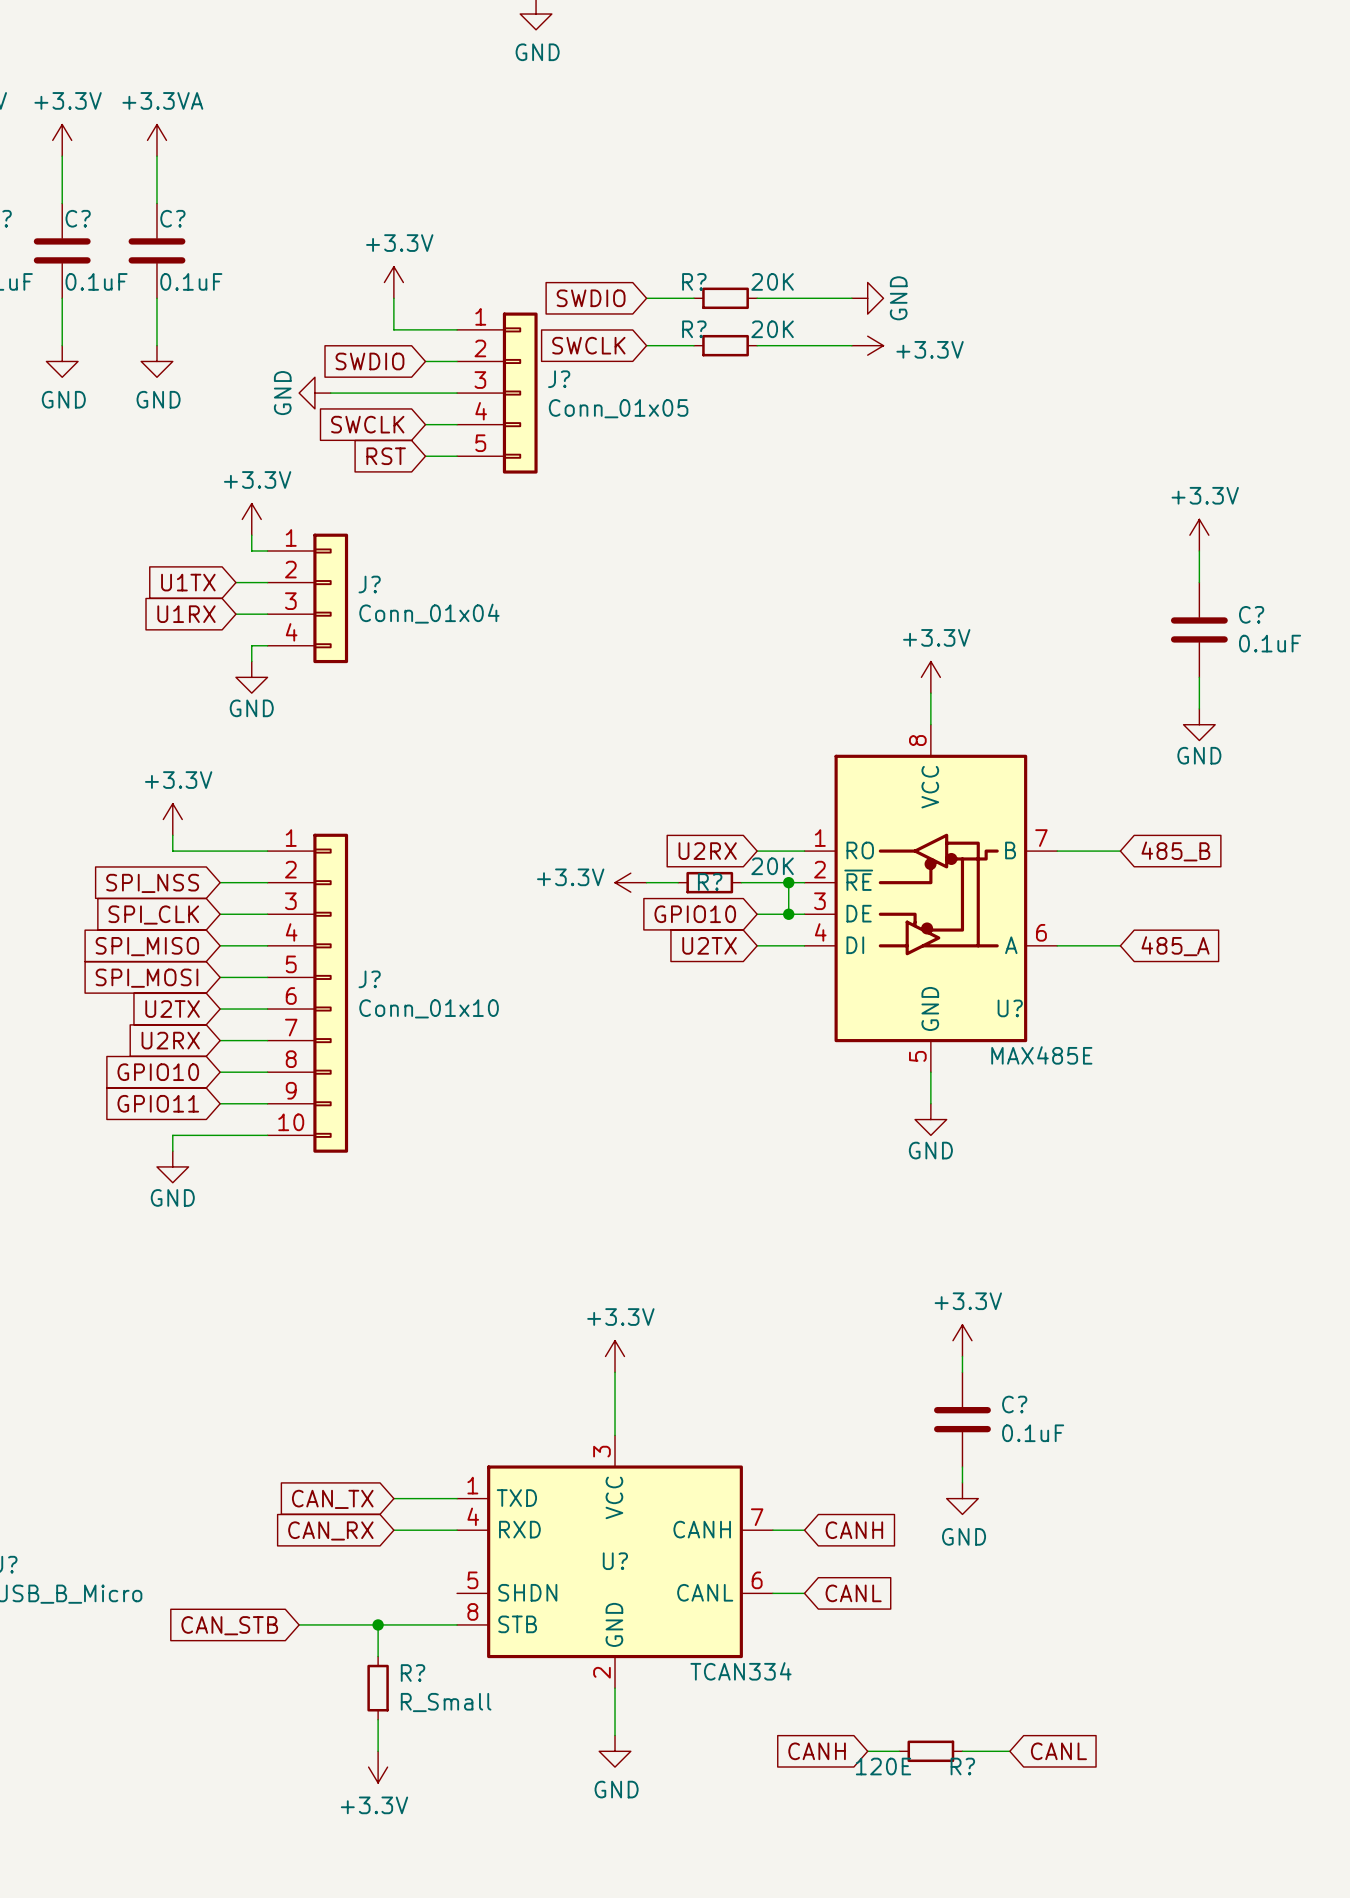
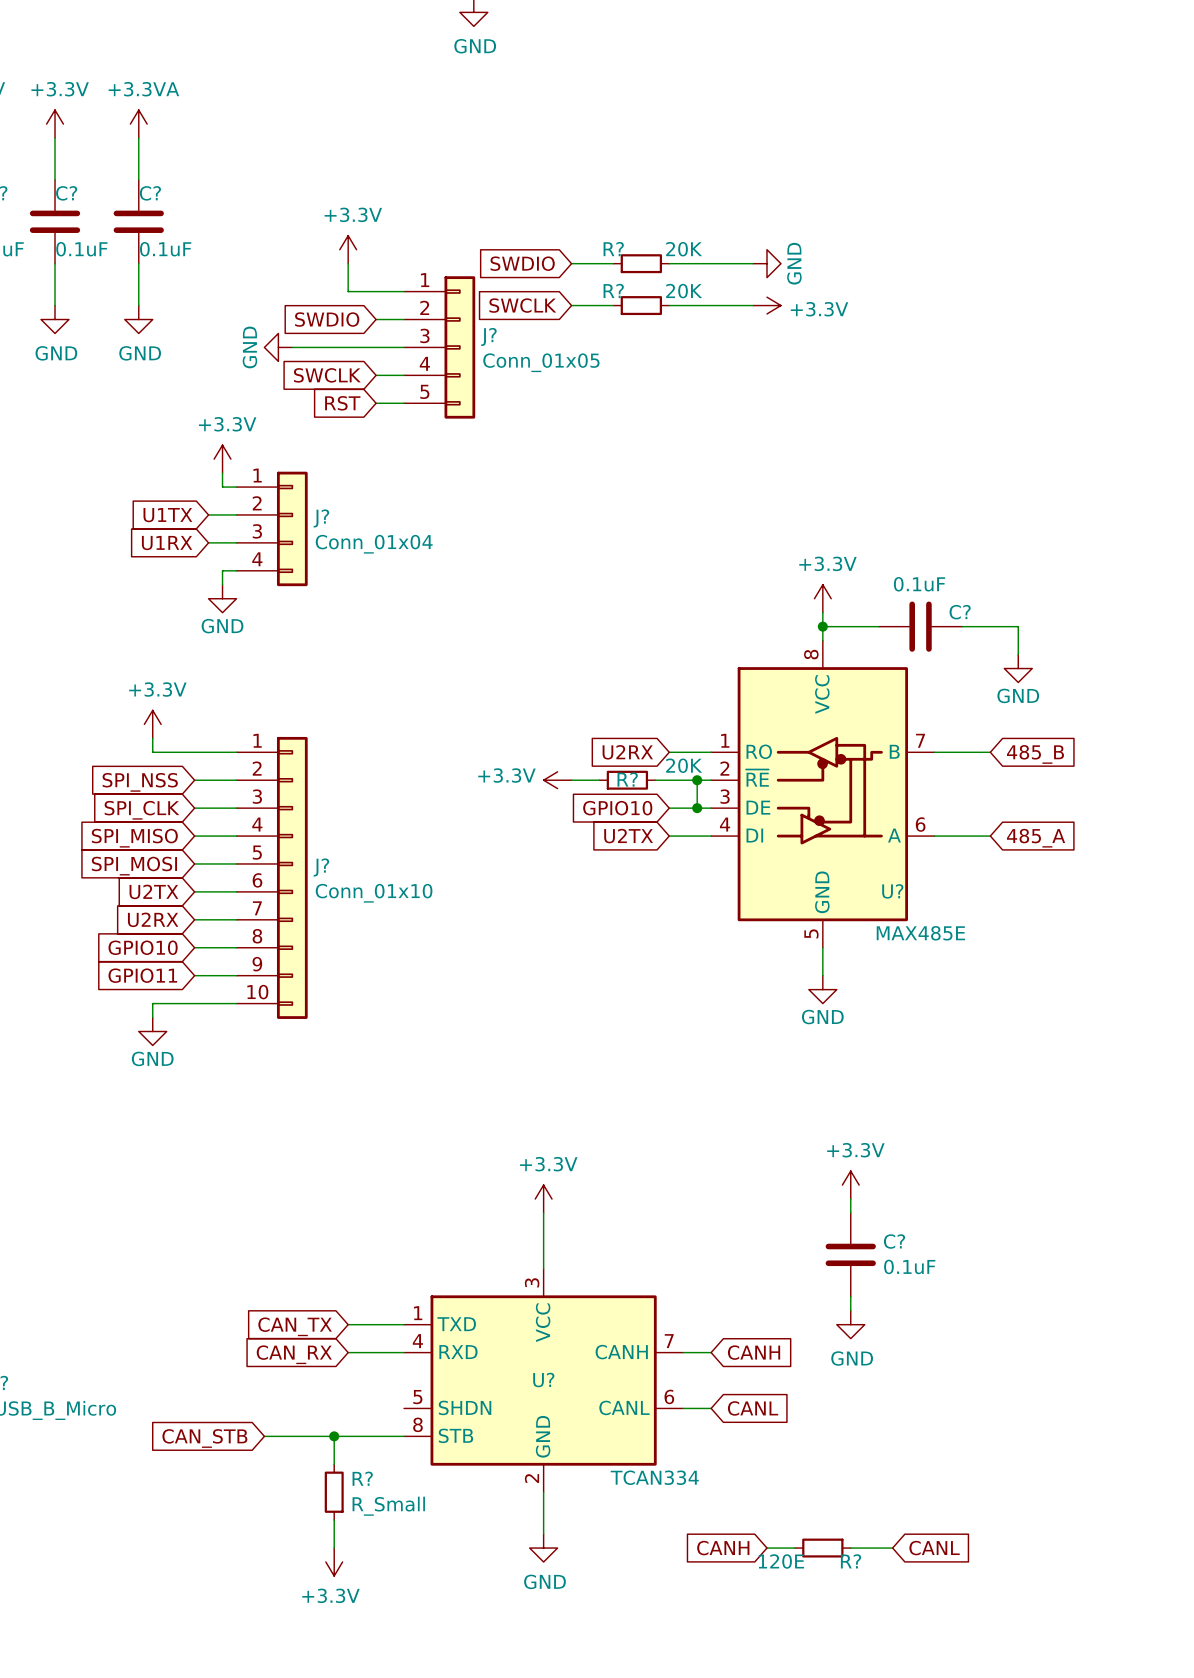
power symbol: +3.3V (1199, 535) -> none
wire: (1199, 550) (1199, 582) -> none
C? rotation: 0° (1199, 629) -> 90° clockwise (920, 626)
C? position: (1199, 629) -> (920, 626)
C? value position: 0.1uF (1270, 643) -> 0.1uF (919, 584)
wire: (1199, 677) (1199, 708) -> none
wire: none -> (822, 626) (878, 626)
junction: none -> (822, 626)
wire: none -> (962, 626) (1018, 626) (1018, 654)
power symbol position: GND (1199, 724) -> GND (1018, 668)

